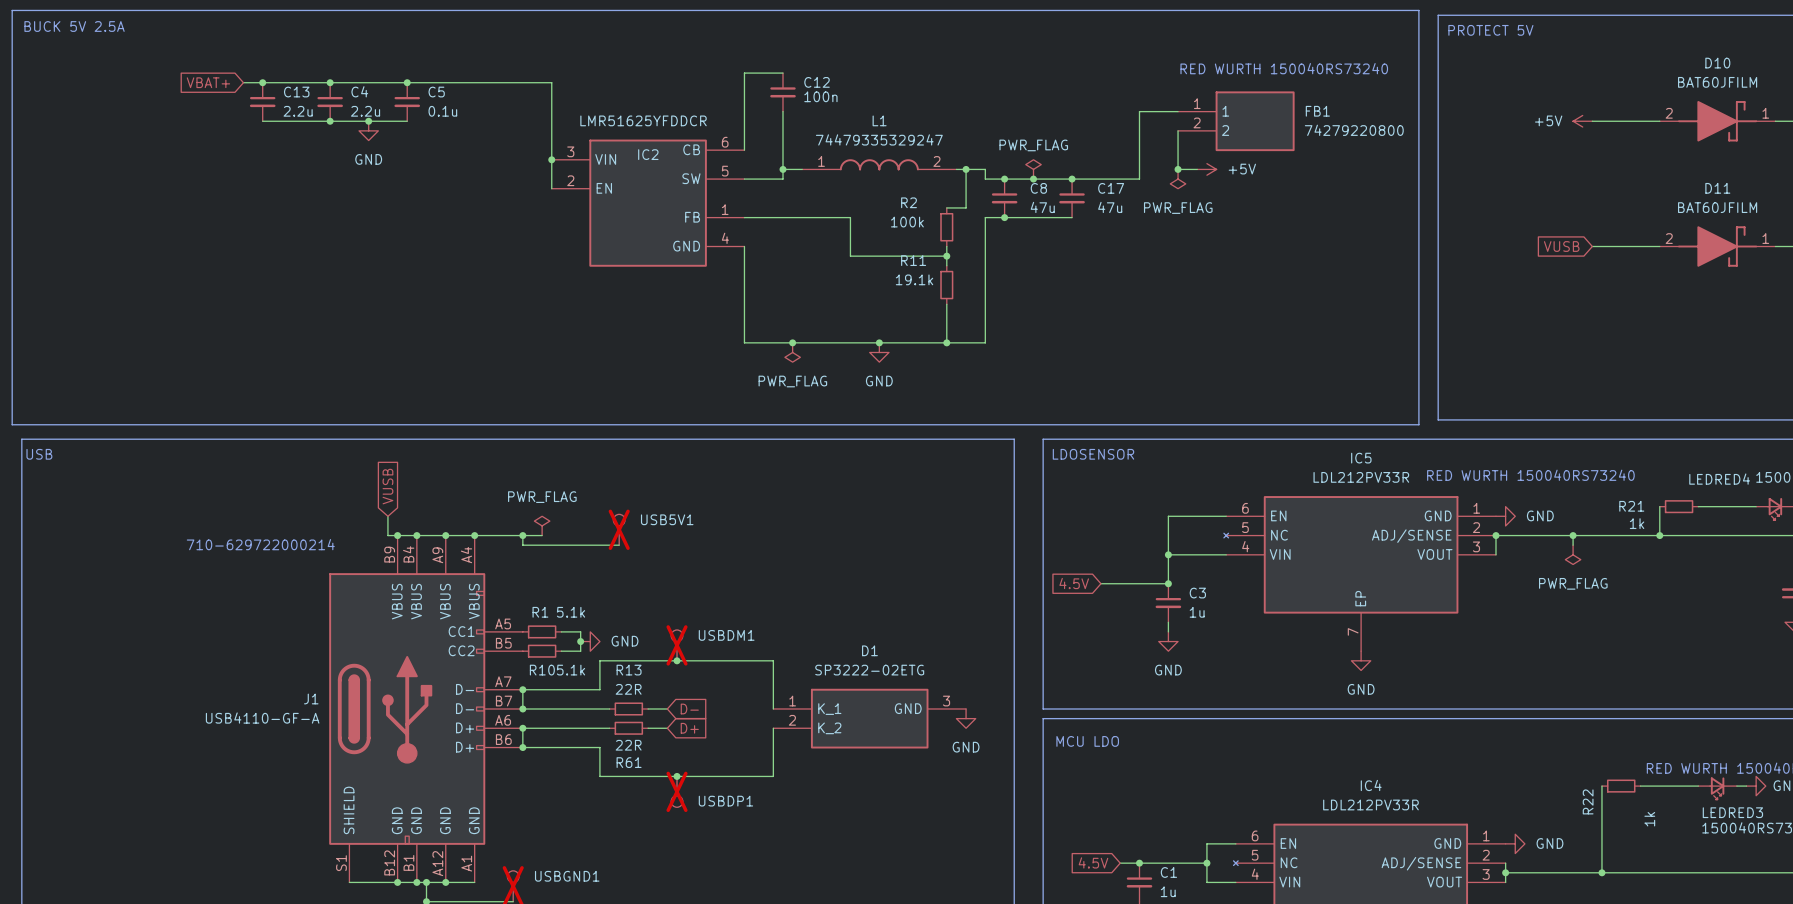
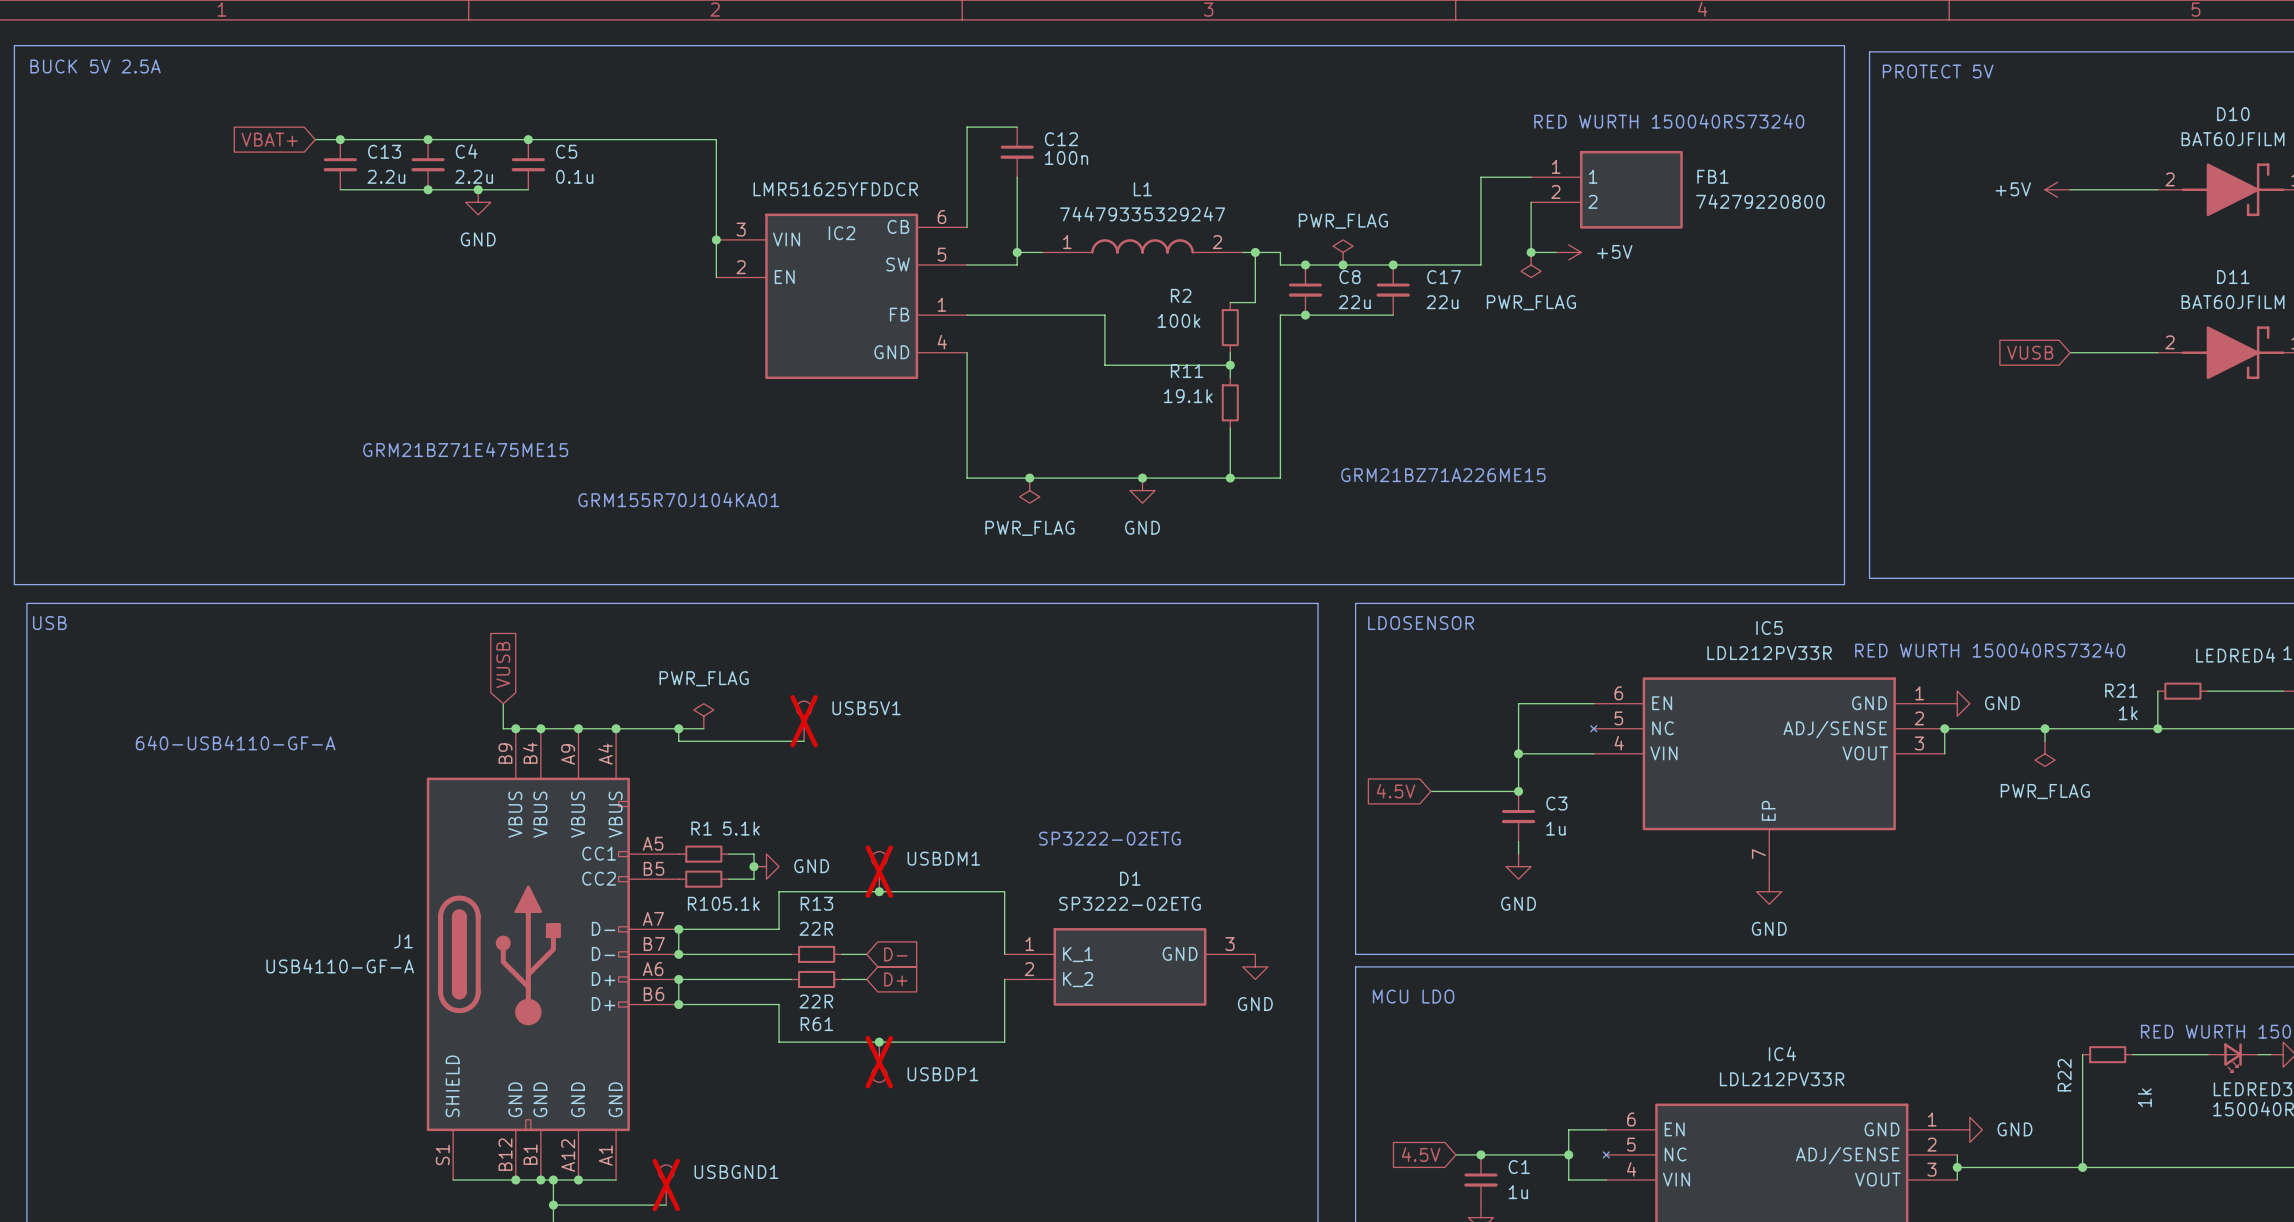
C8 value: 47u (1042, 207) -> 22u (1354, 302)
C17 value: 47u (1110, 207) -> 22u (1442, 302)
text: none -> GRM21BZ71E475ME15 (465, 449)
text: none -> GRM21BZ71A226ME15 (1443, 475)
text: none -> GRM155R70J104KA01 (678, 499)
text: 710-629722000214 (260, 544) -> none
text: none -> 640-USB4110-GF-A (235, 743)
text: none -> SP3222-02ETG (1109, 838)

